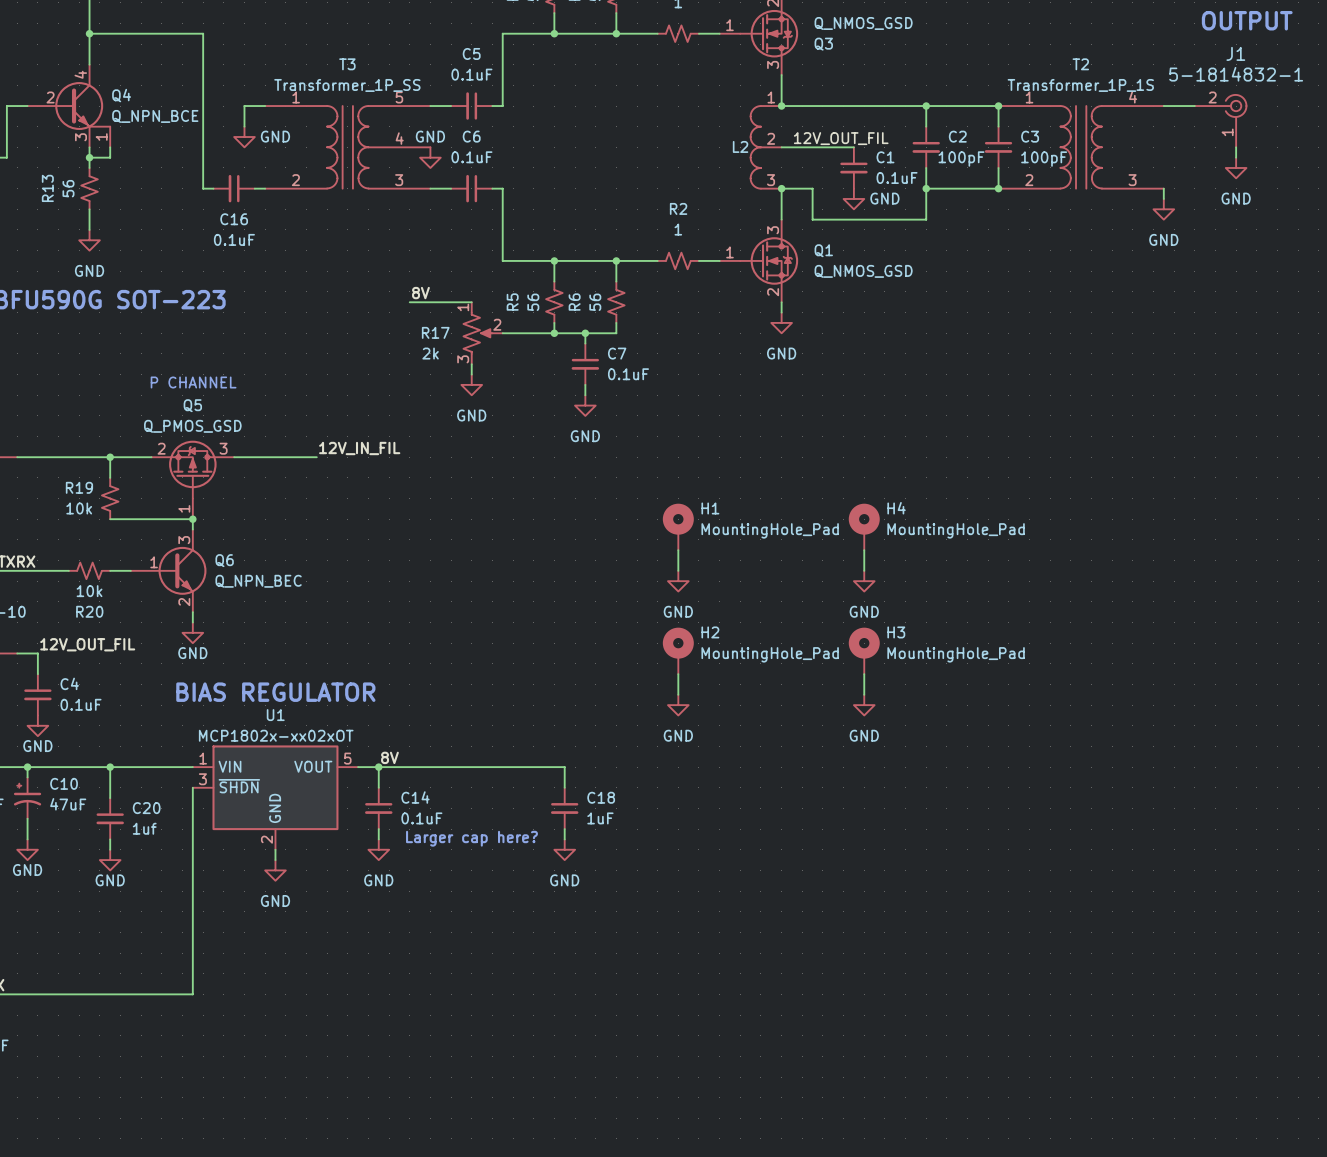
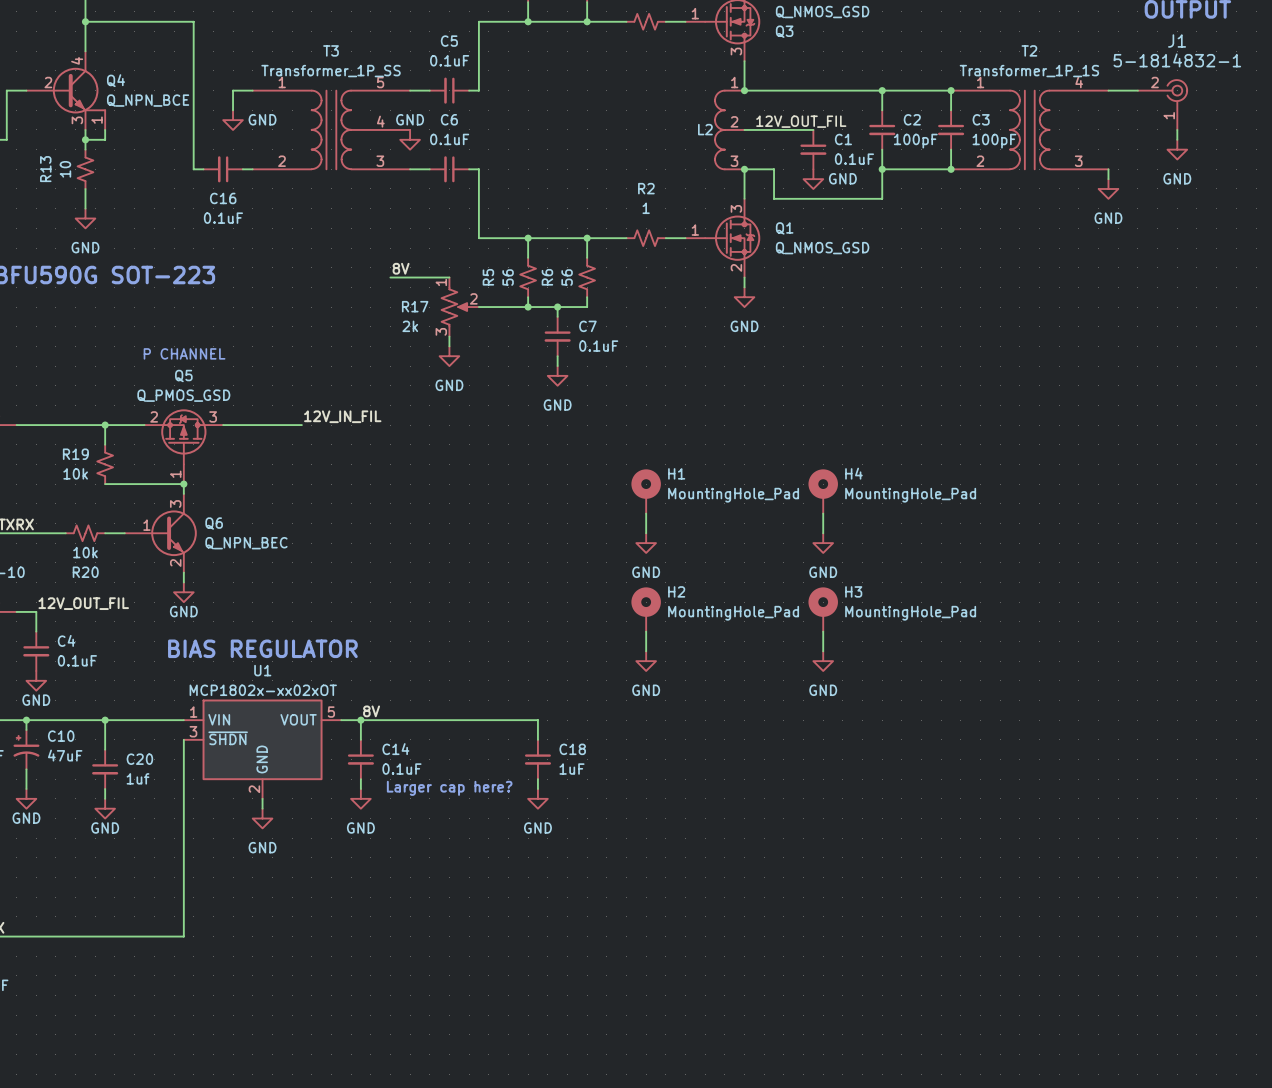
R13 value: 56 (68, 188) -> 10 (65, 169)

